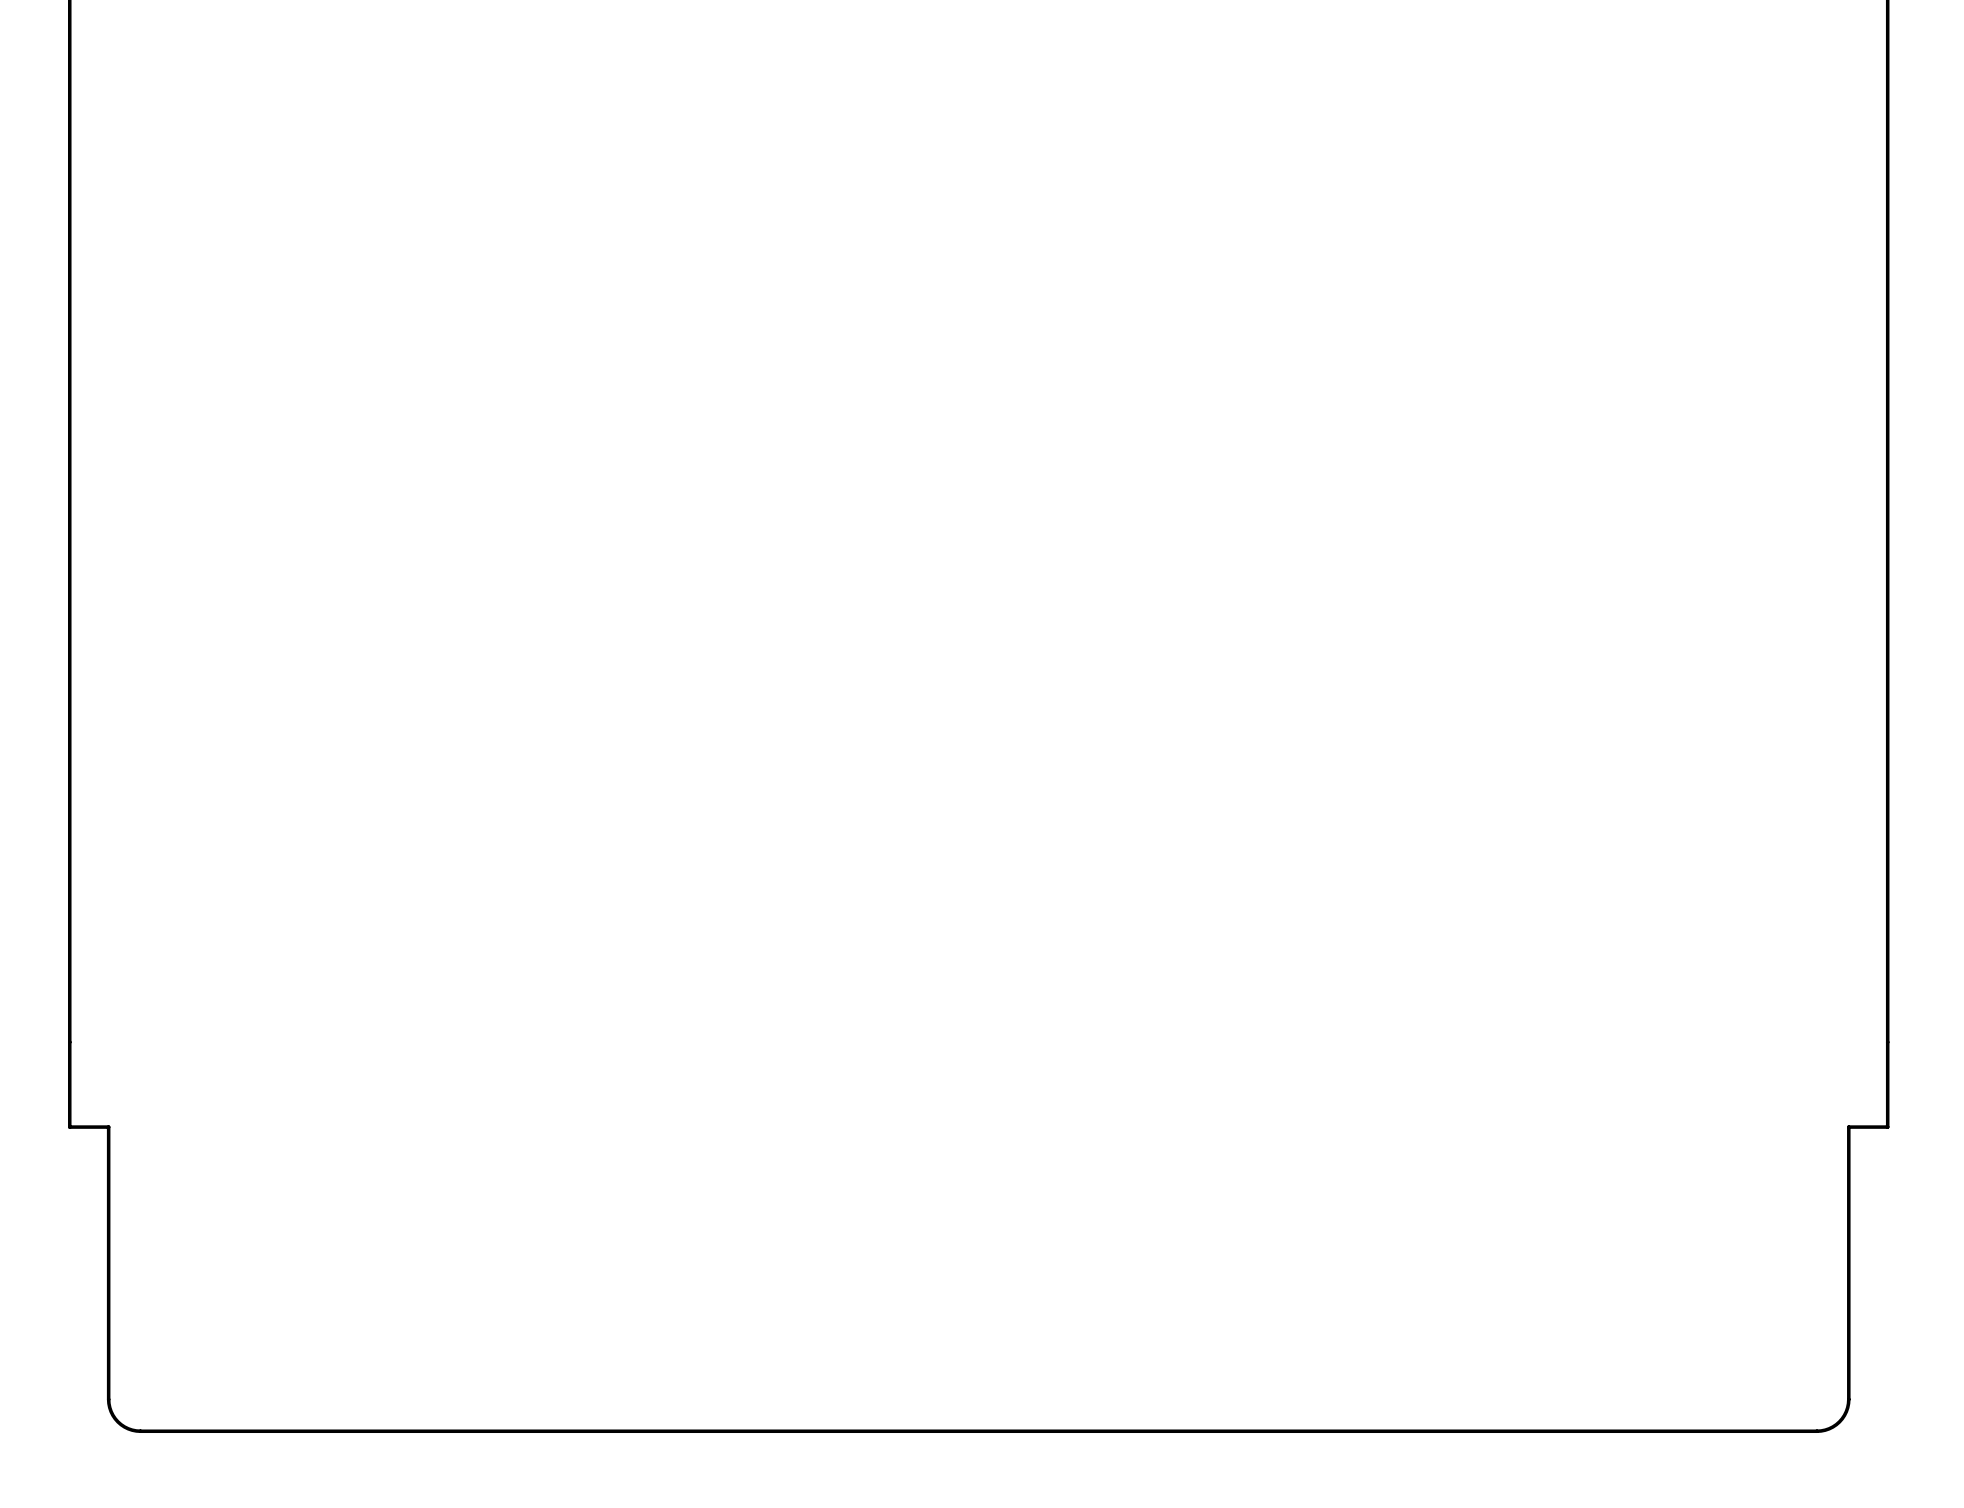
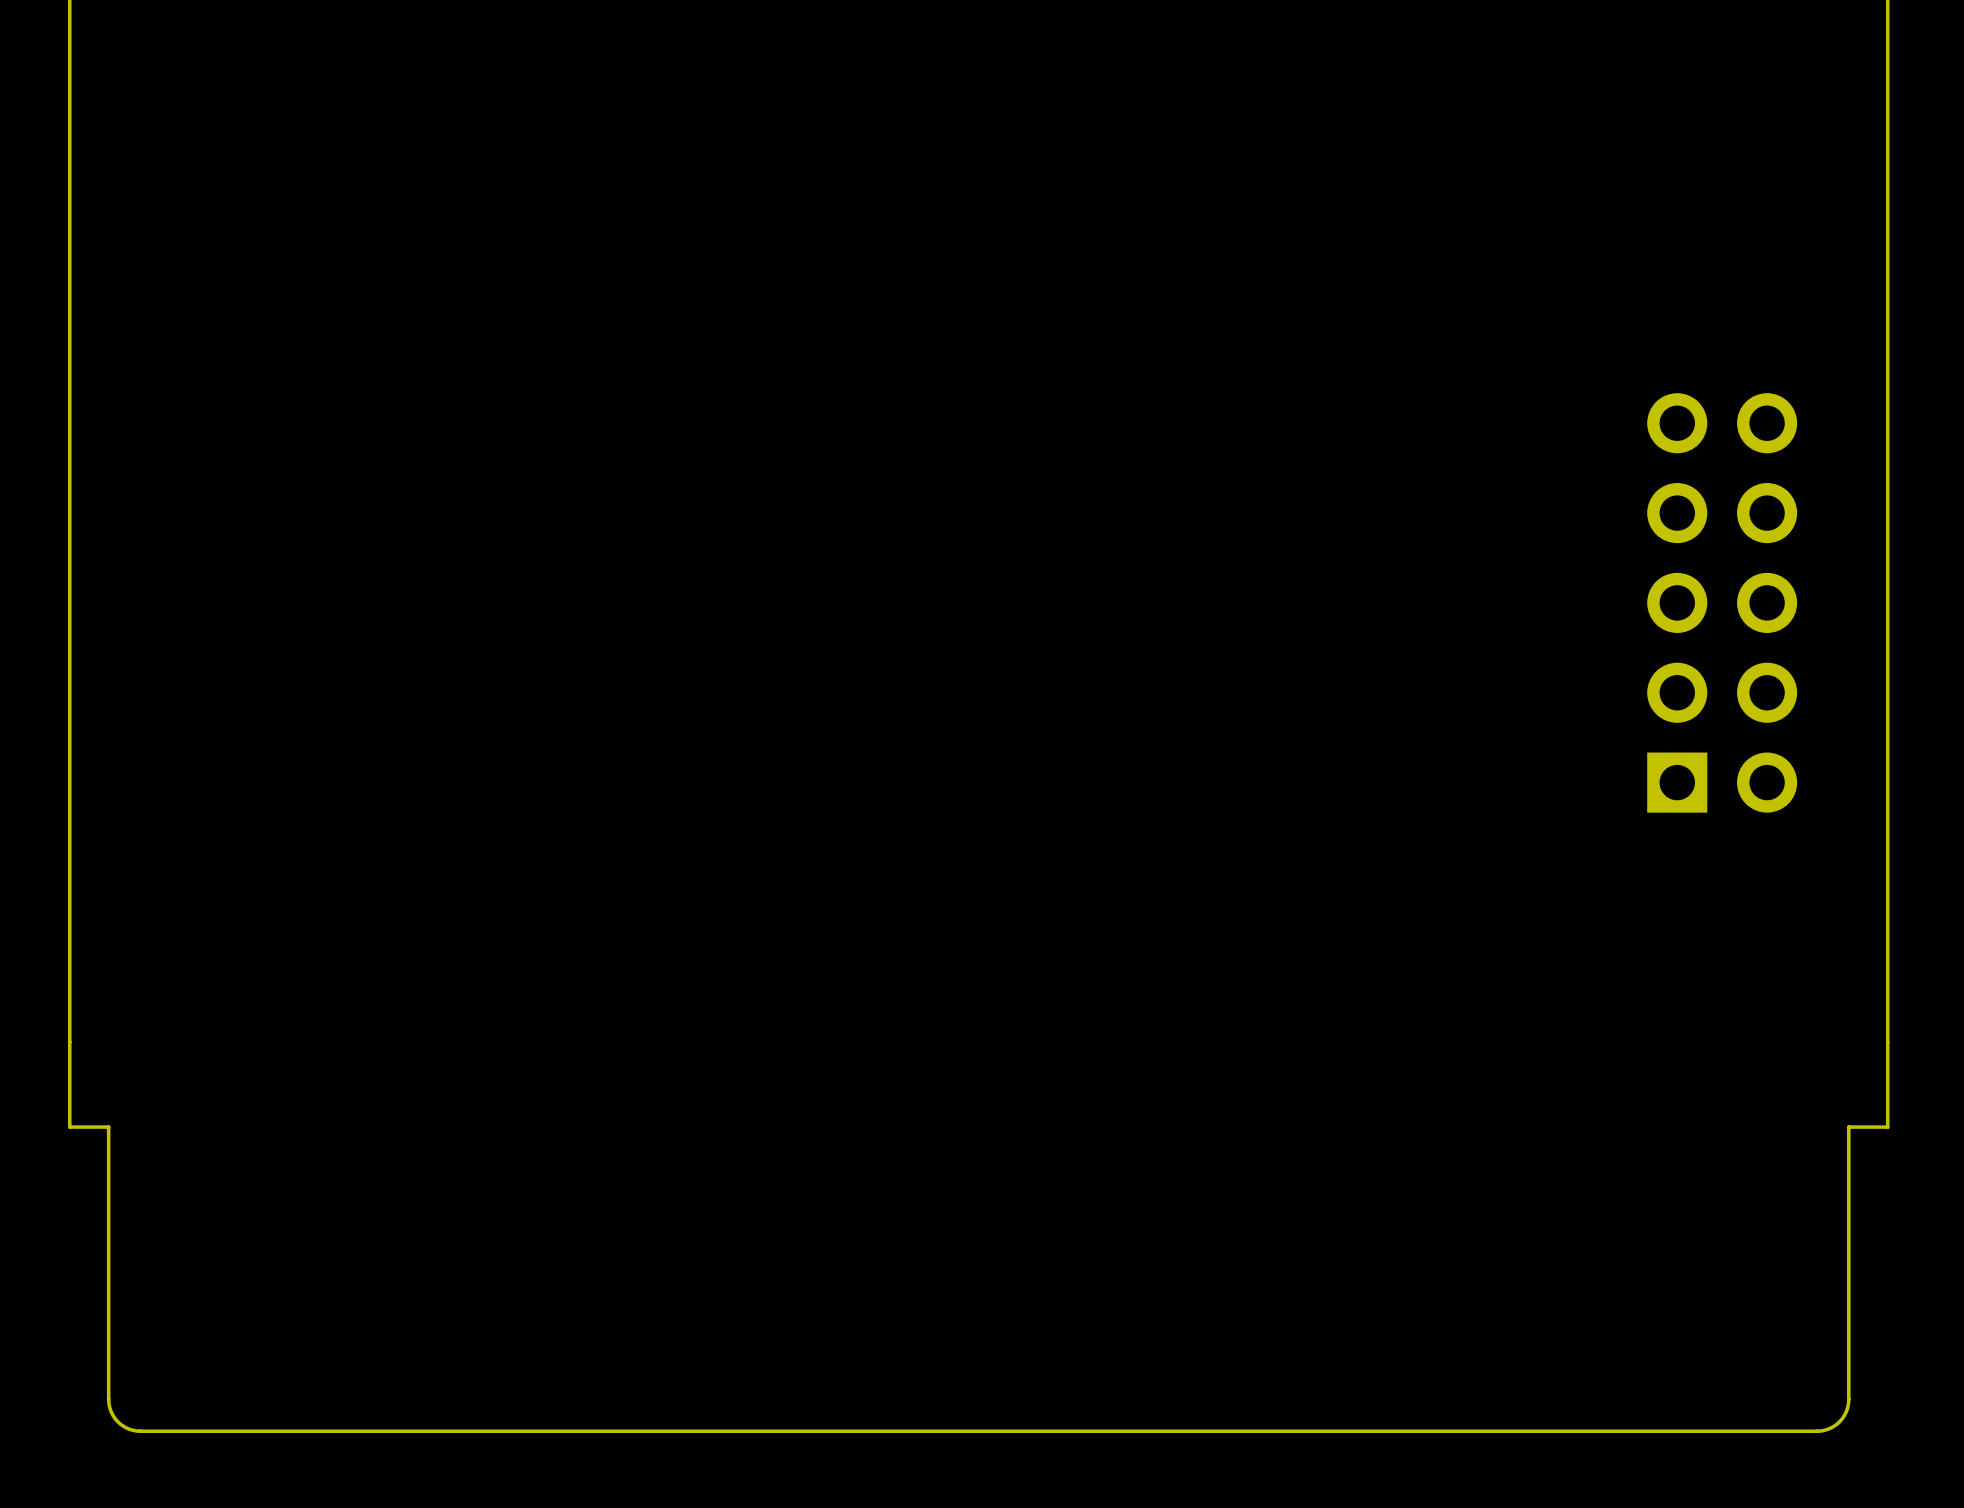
part: none -> (1722, 602)

